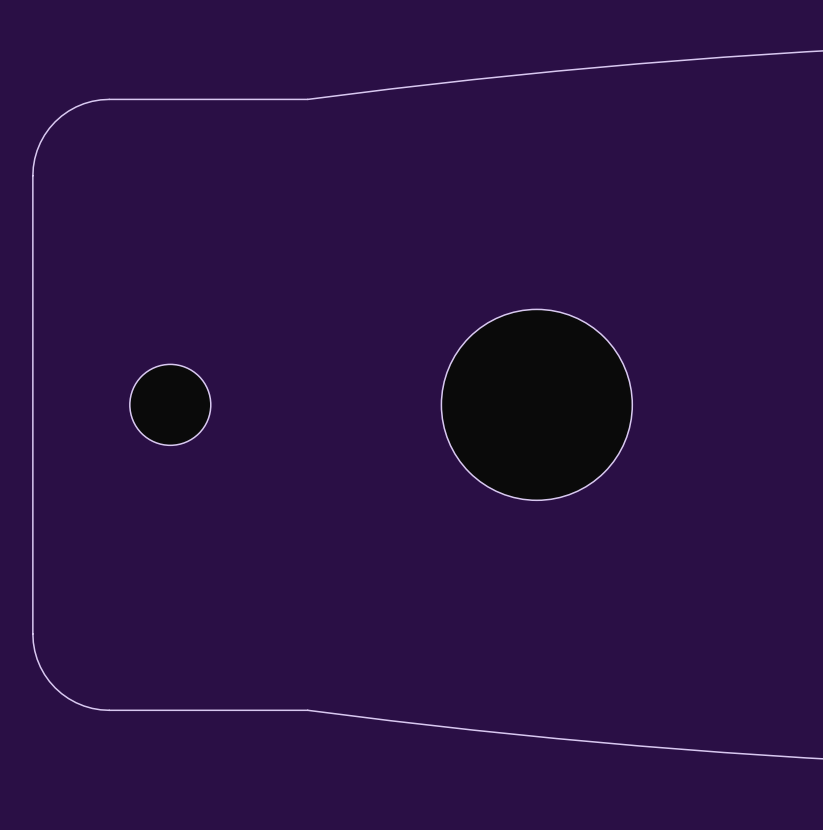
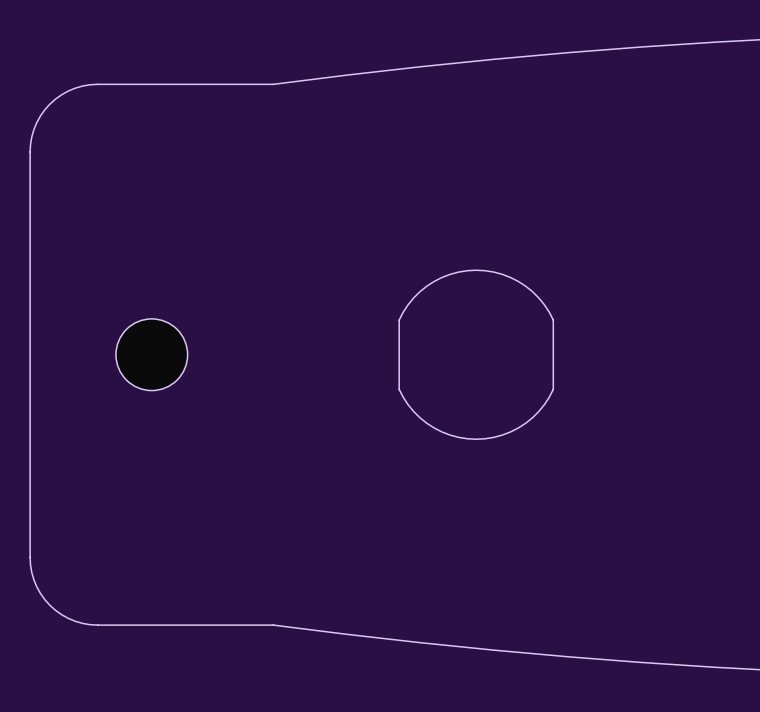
board edge: none -> (553, 320) (553, 389) (544, 404) (532, 417) (510, 431) (493, 437) (476, 439) (458, 437) (441, 431) (419, 417) (408, 404) (399, 389) (399, 320) (408, 304) (419, 291) (441, 277) (458, 272) (476, 270) (493, 272) (510, 277) (532, 291) (544, 304) (553, 320)
hole: (536, 404) -> none

